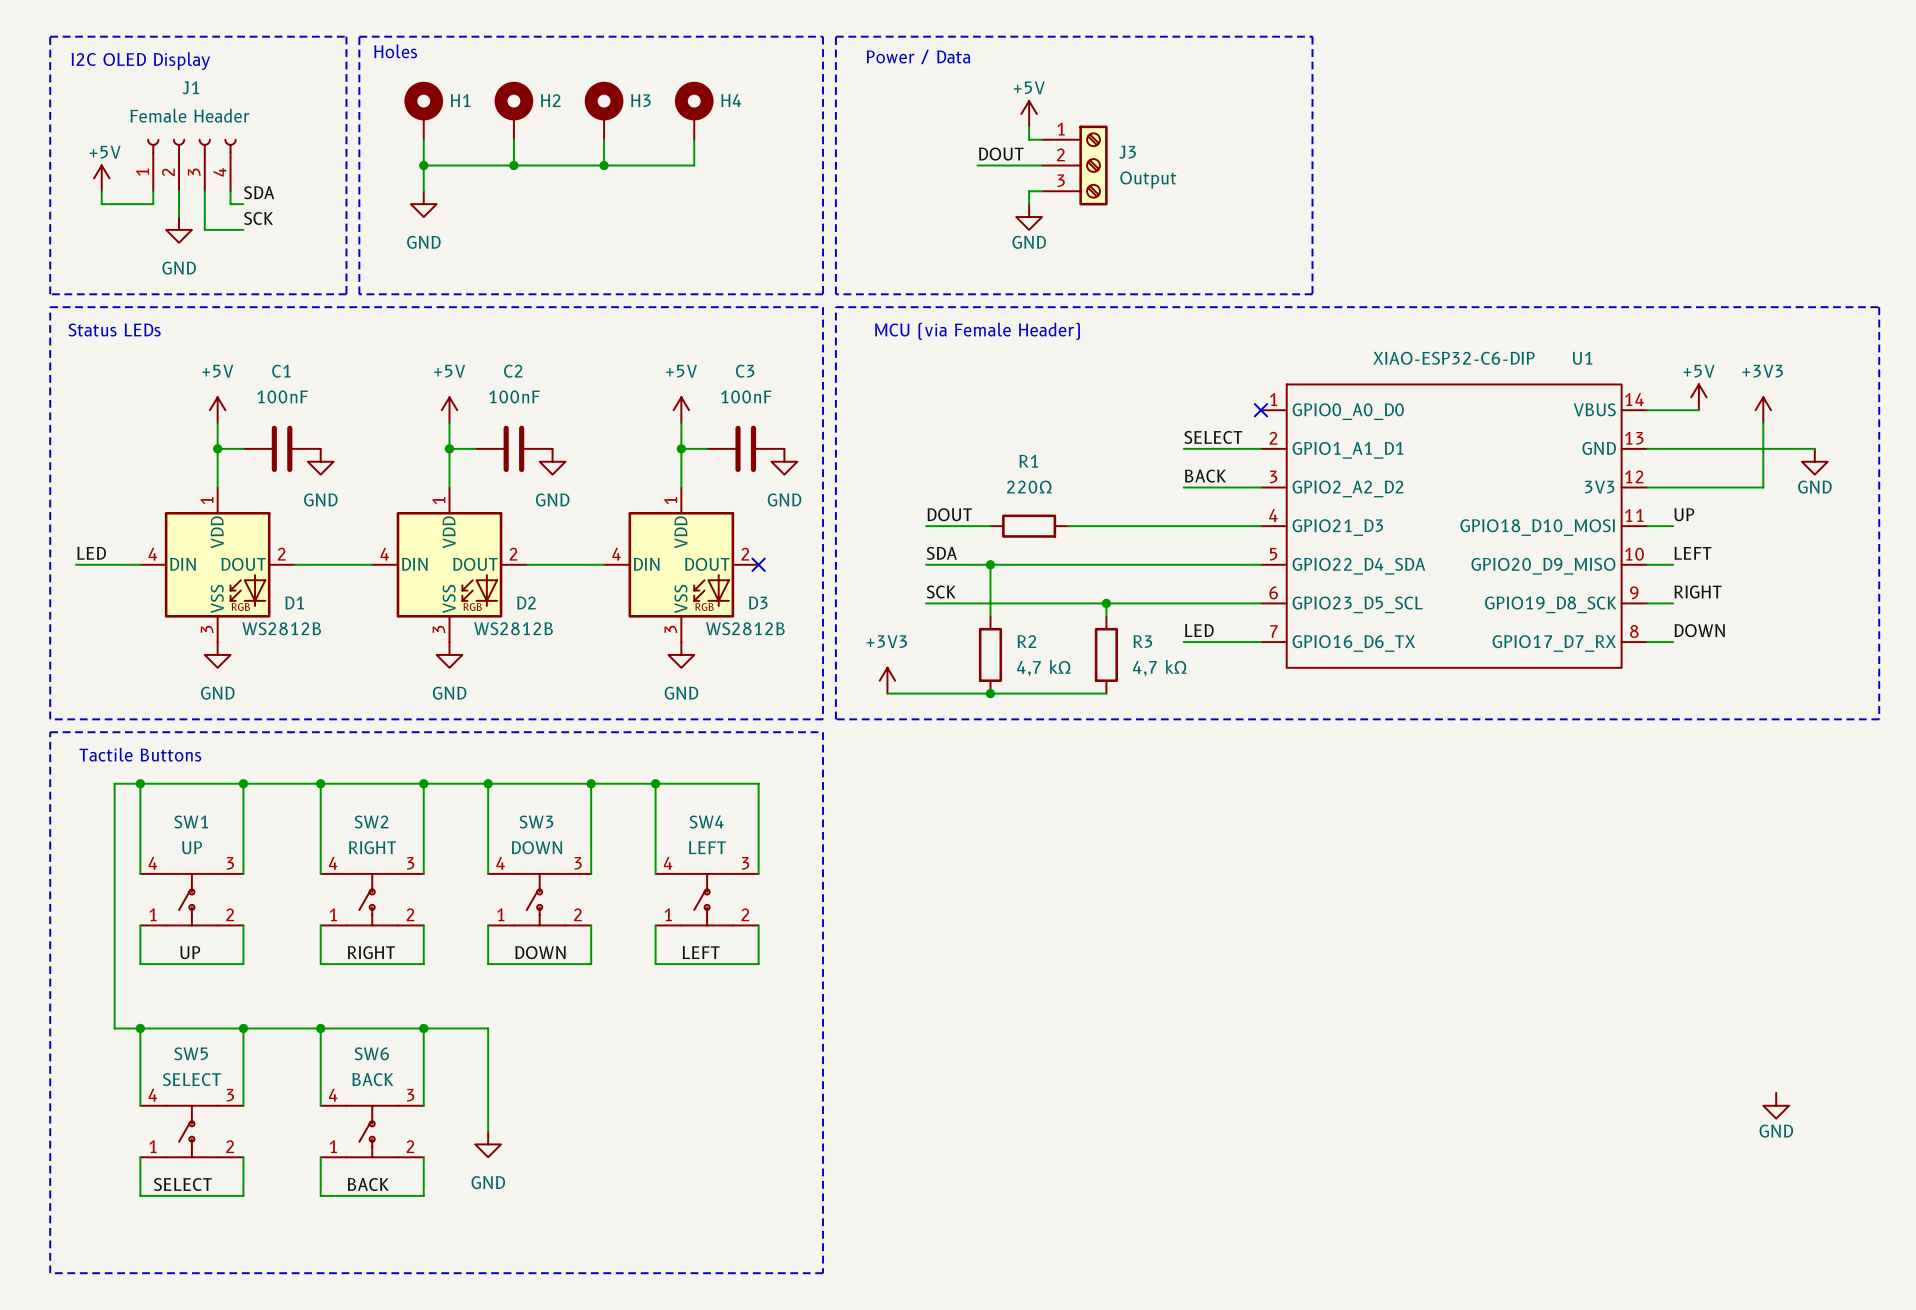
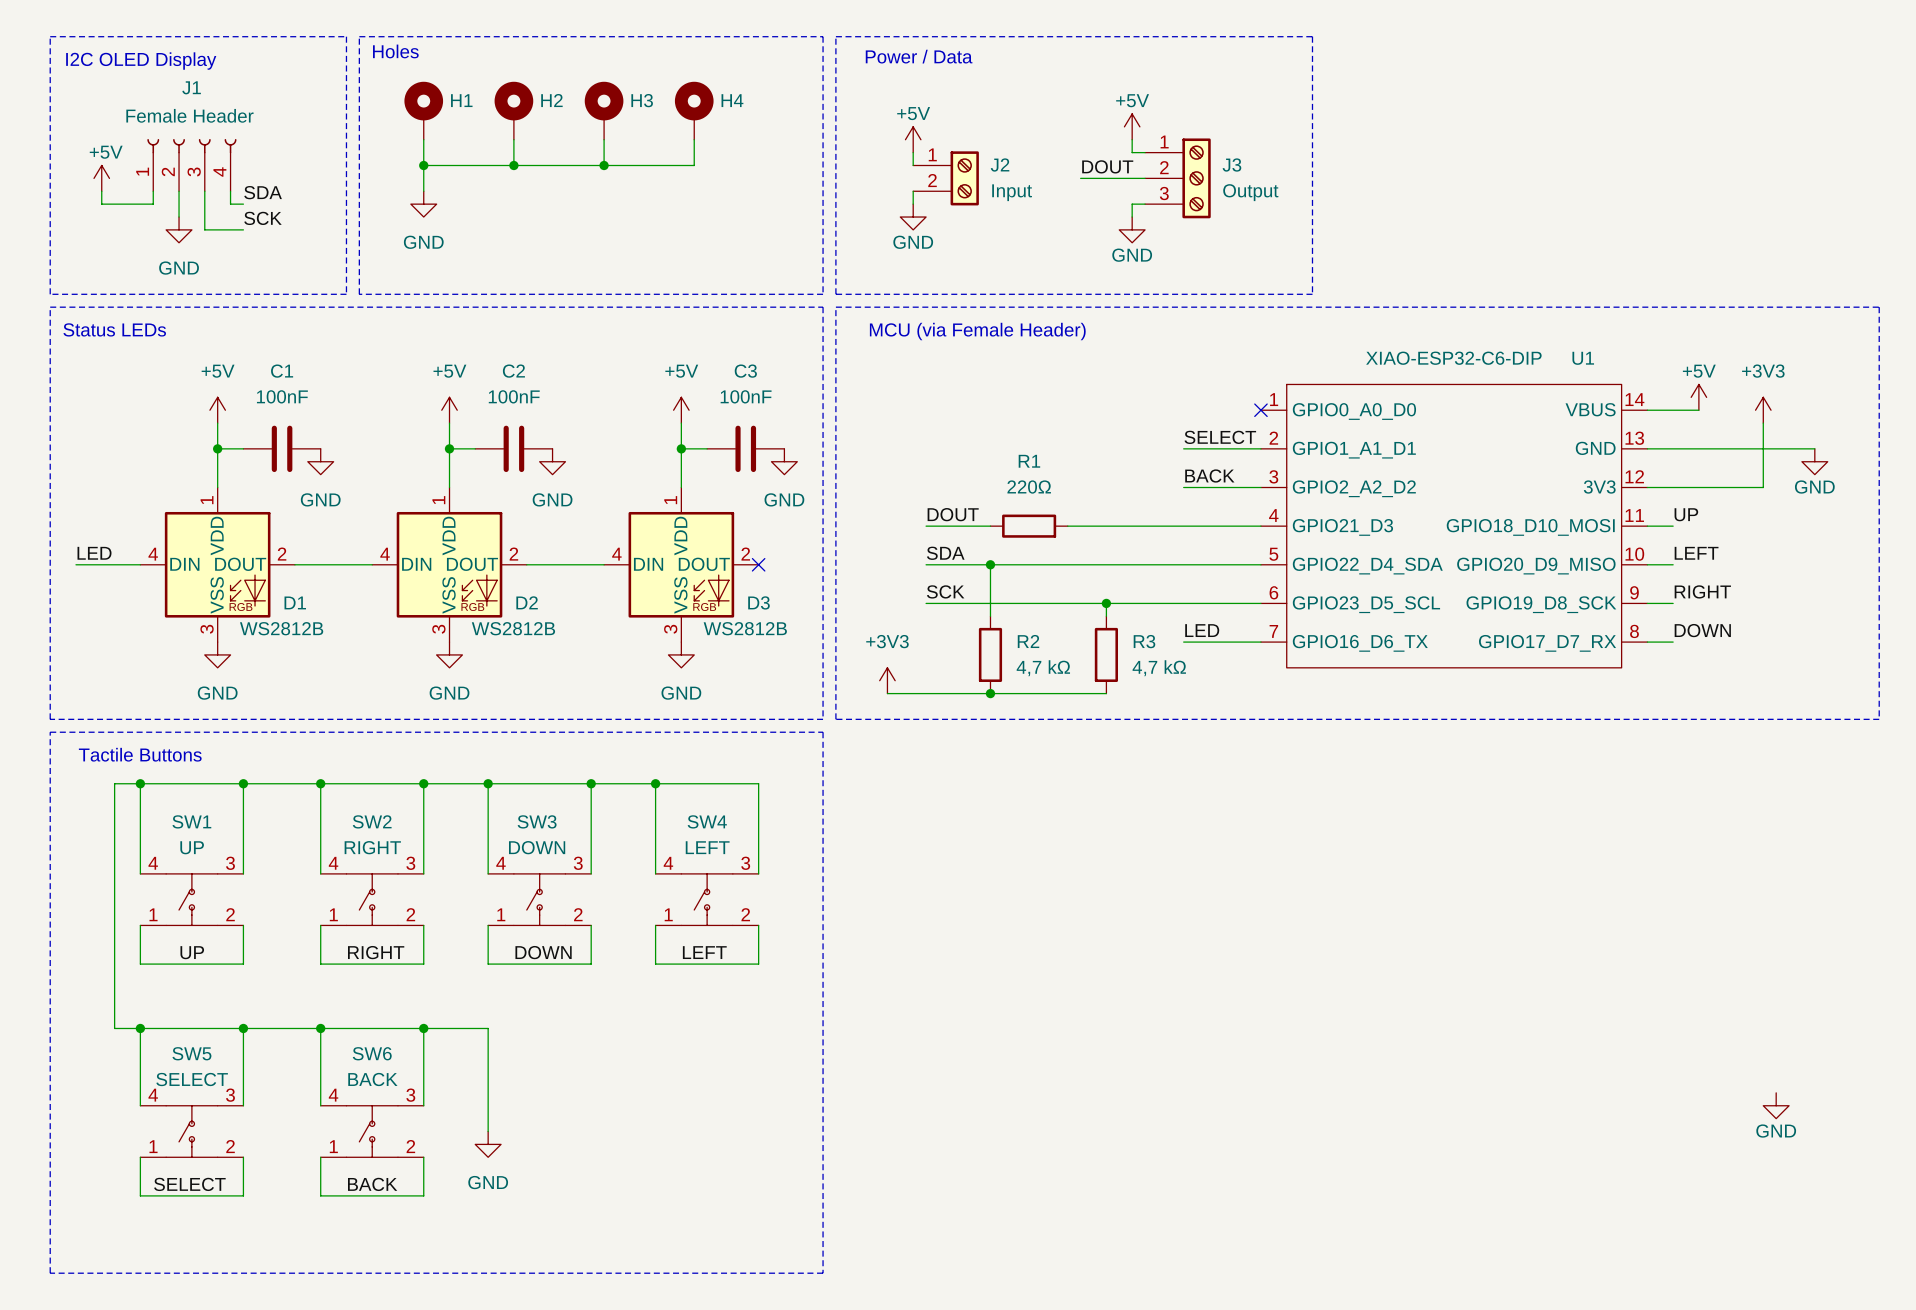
power symbol: +5V (1029, 113) -> none
wire: (1029, 126) (1029, 139) (1042, 139) -> (1132, 139) (1132, 152) (1145, 152)
power symbol: none -> +5V (1132, 126)
power symbol: none -> +5V (913, 139)
wire: none -> (913, 152) (913, 165)
label position: DOUT (1001, 154) -> DOUT (1107, 166)
wire: (977, 165) (1042, 165) -> (1080, 178) (1145, 178)
J3 position: (1074, 165) -> (1177, 178)
J2: none -> Input (946, 178)
wire: none -> (913, 191) (913, 204)
wire: (1042, 191) (1029, 191) (1029, 204) -> (1145, 204) (1132, 204) (1132, 217)
power symbol: none -> GND (913, 217)
power symbol: GND (1029, 217) -> none
power symbol: none -> GND (1132, 229)

